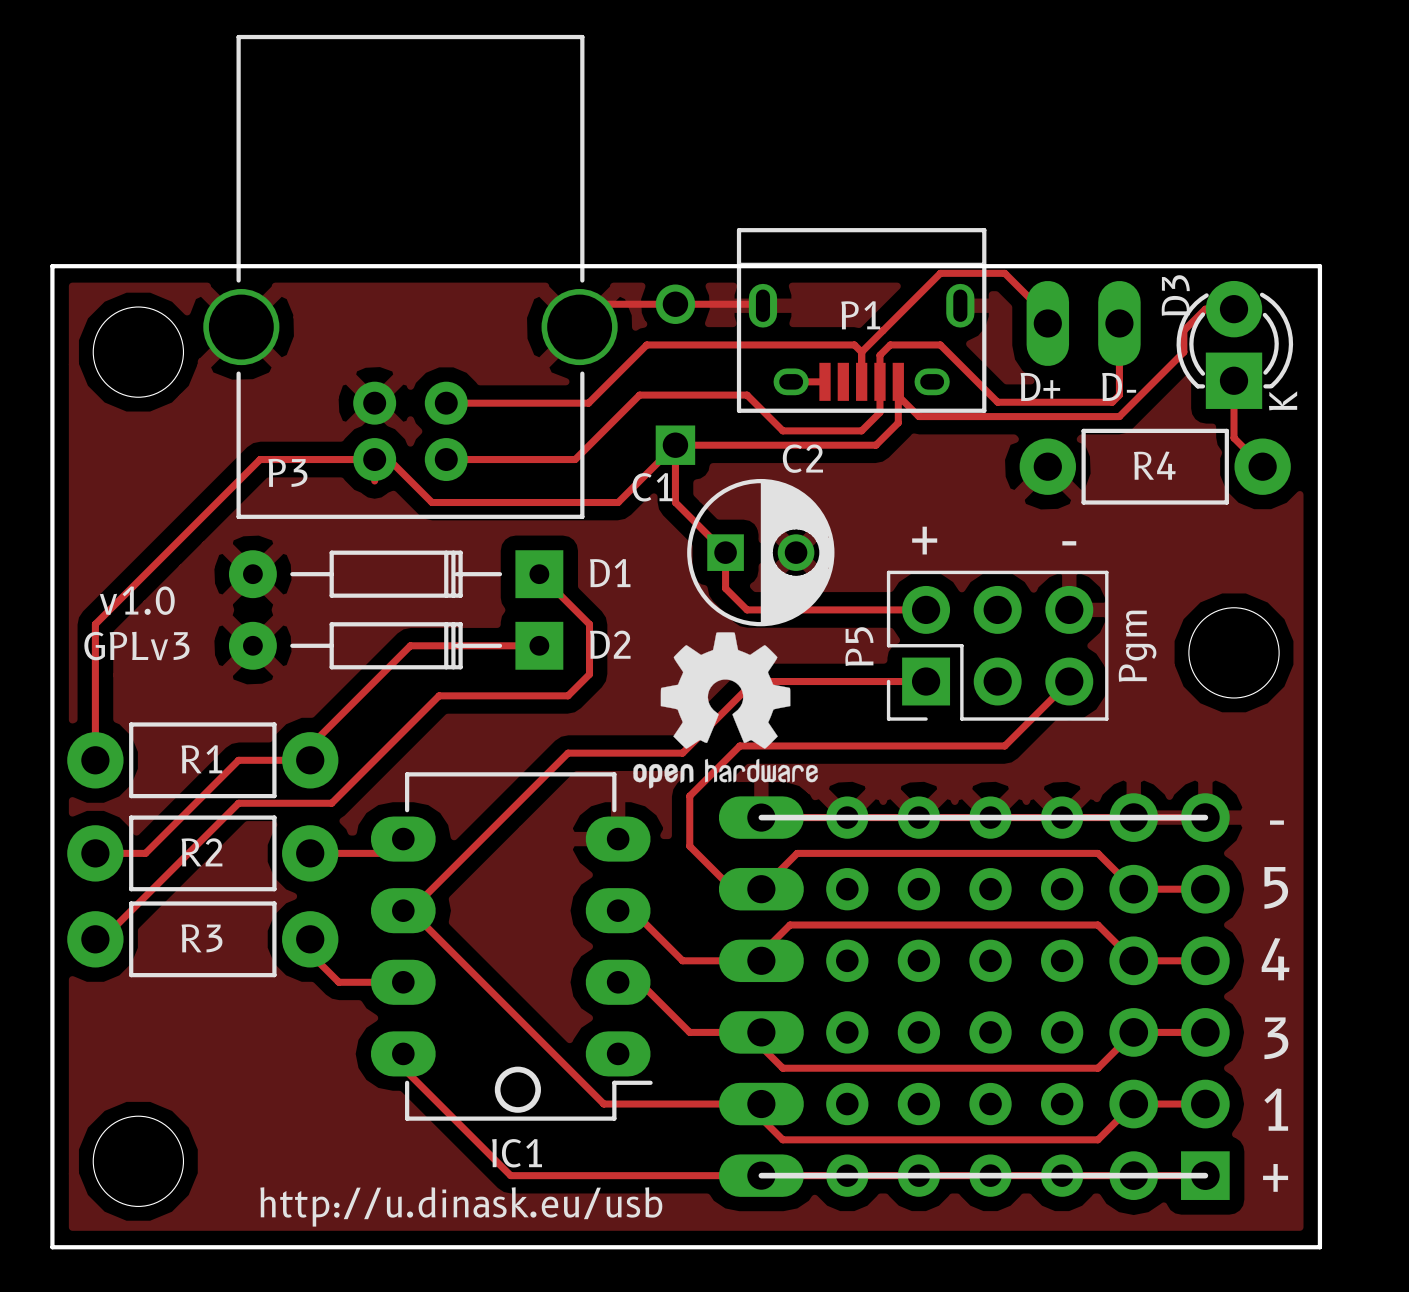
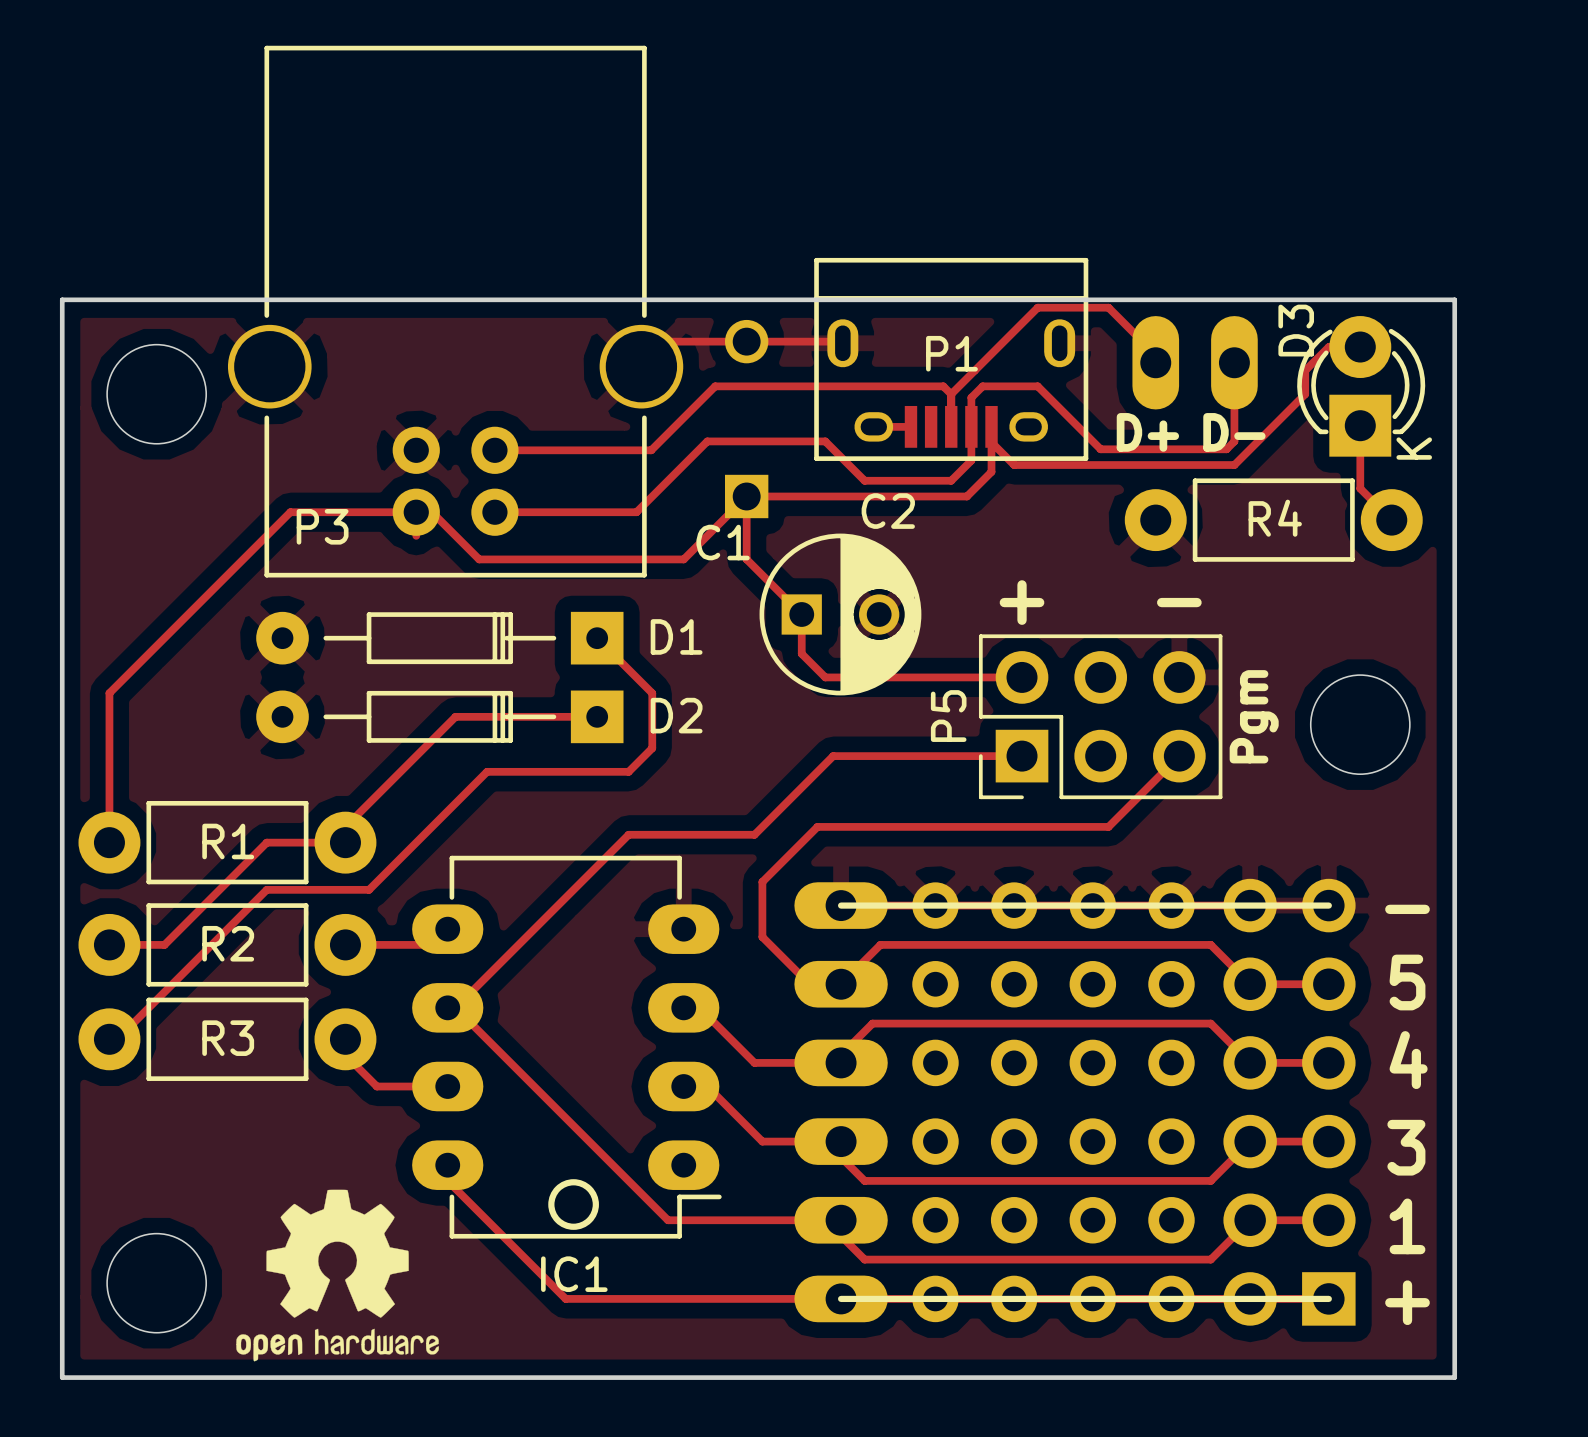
text: v1.0 (137, 600) -> none
text: GPLv3 (136, 646) -> none
drawing position: (725, 710) -> (337, 1275)
text: http://u.dinask.eu/usb (461, 1206) -> none

